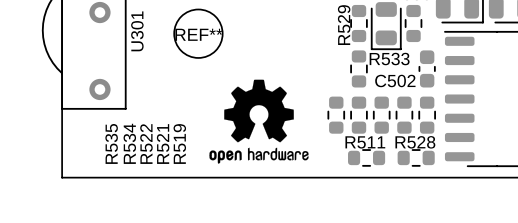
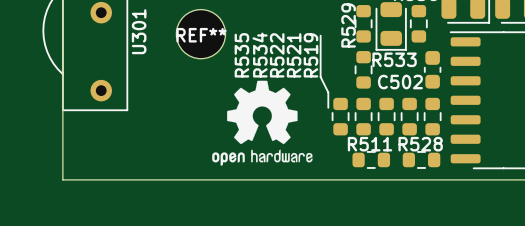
line: none -> (320, 35) (320, 77) (328, 92) (328, 107)
R535 name position: R535 (111, 143) -> R535 (241, 55)
R534 name position: R534 (129, 143) -> R534 (260, 55)
R522 name position: R522 (146, 144) -> R522 (277, 55)
R521 name position: R521 (163, 144) -> R521 (294, 55)
R519 name position: R519 (179, 144) -> R519 (310, 55)

